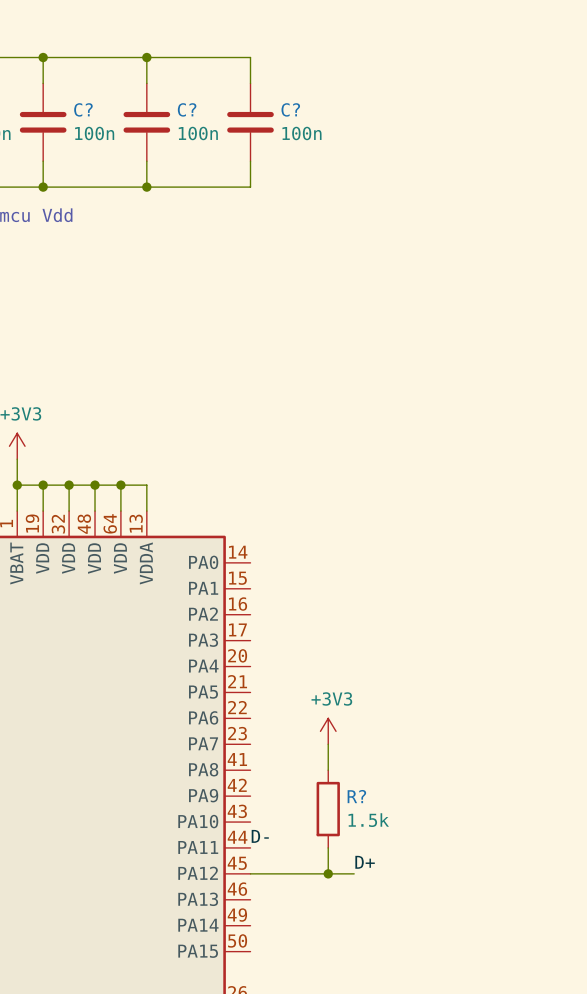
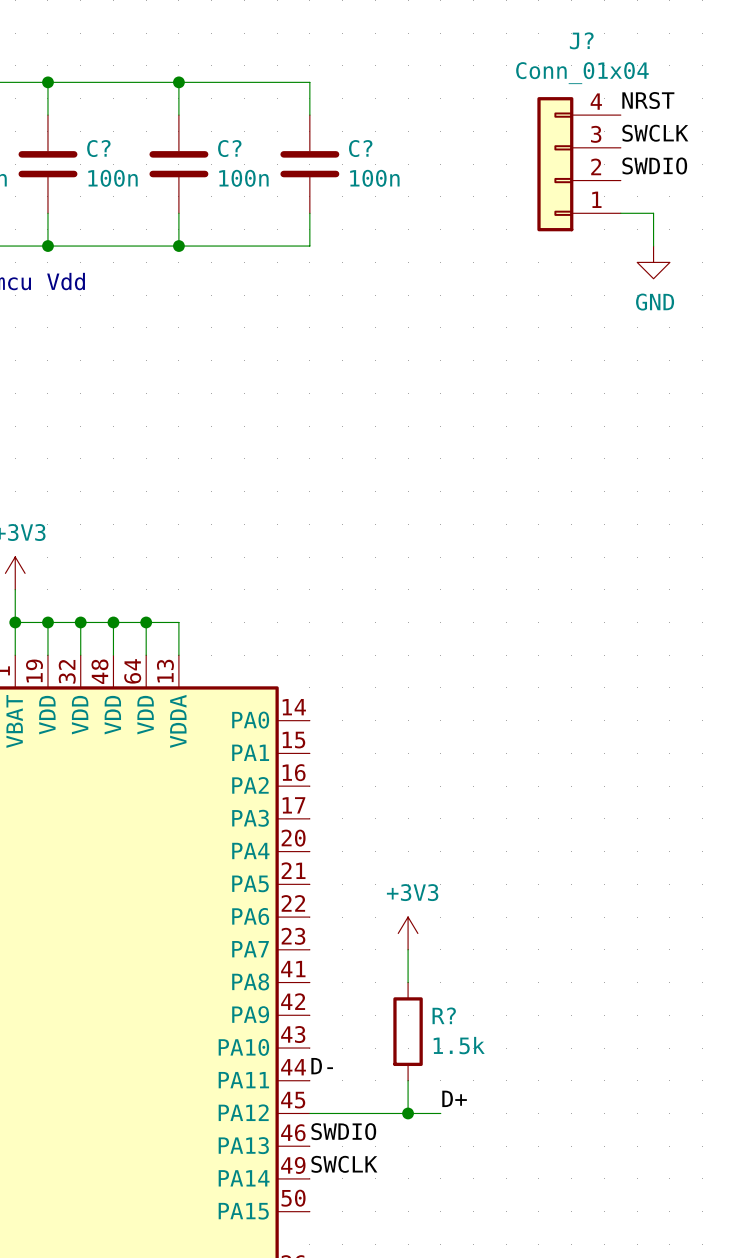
label: none -> NRST (648, 100)
label: none -> SWCLK (655, 133)
J?: none -> Conn_01x04 (579, 164)
label: none -> SWDIO (654, 165)
wire: none -> (620, 213) (653, 213) (653, 246)
power symbol: none -> GND (653, 262)
label: none -> SWDIO (343, 1131)
label: none -> SWCLK (344, 1164)

